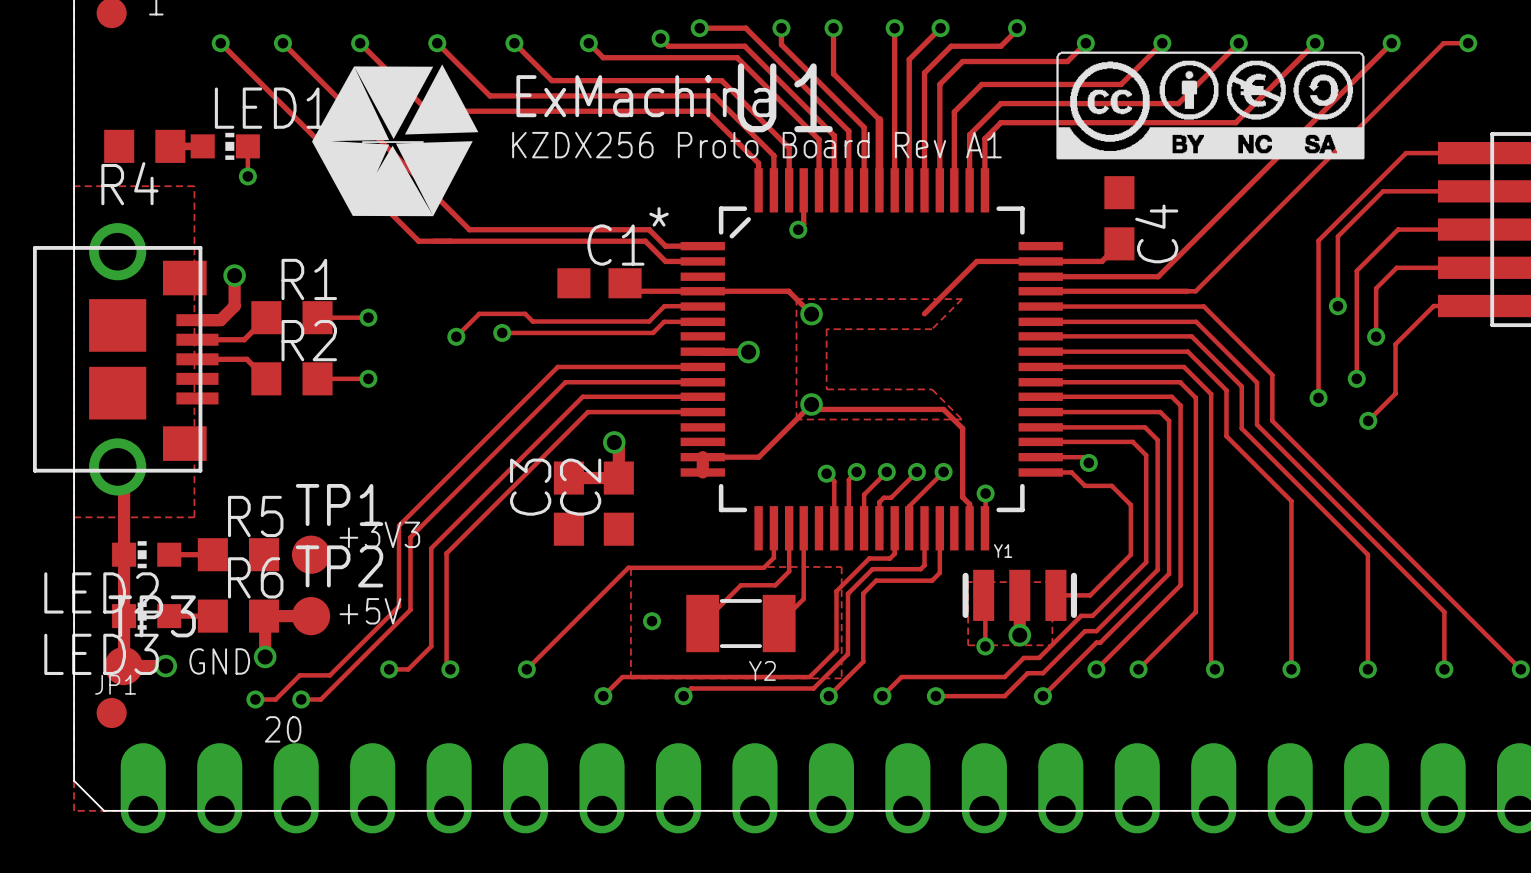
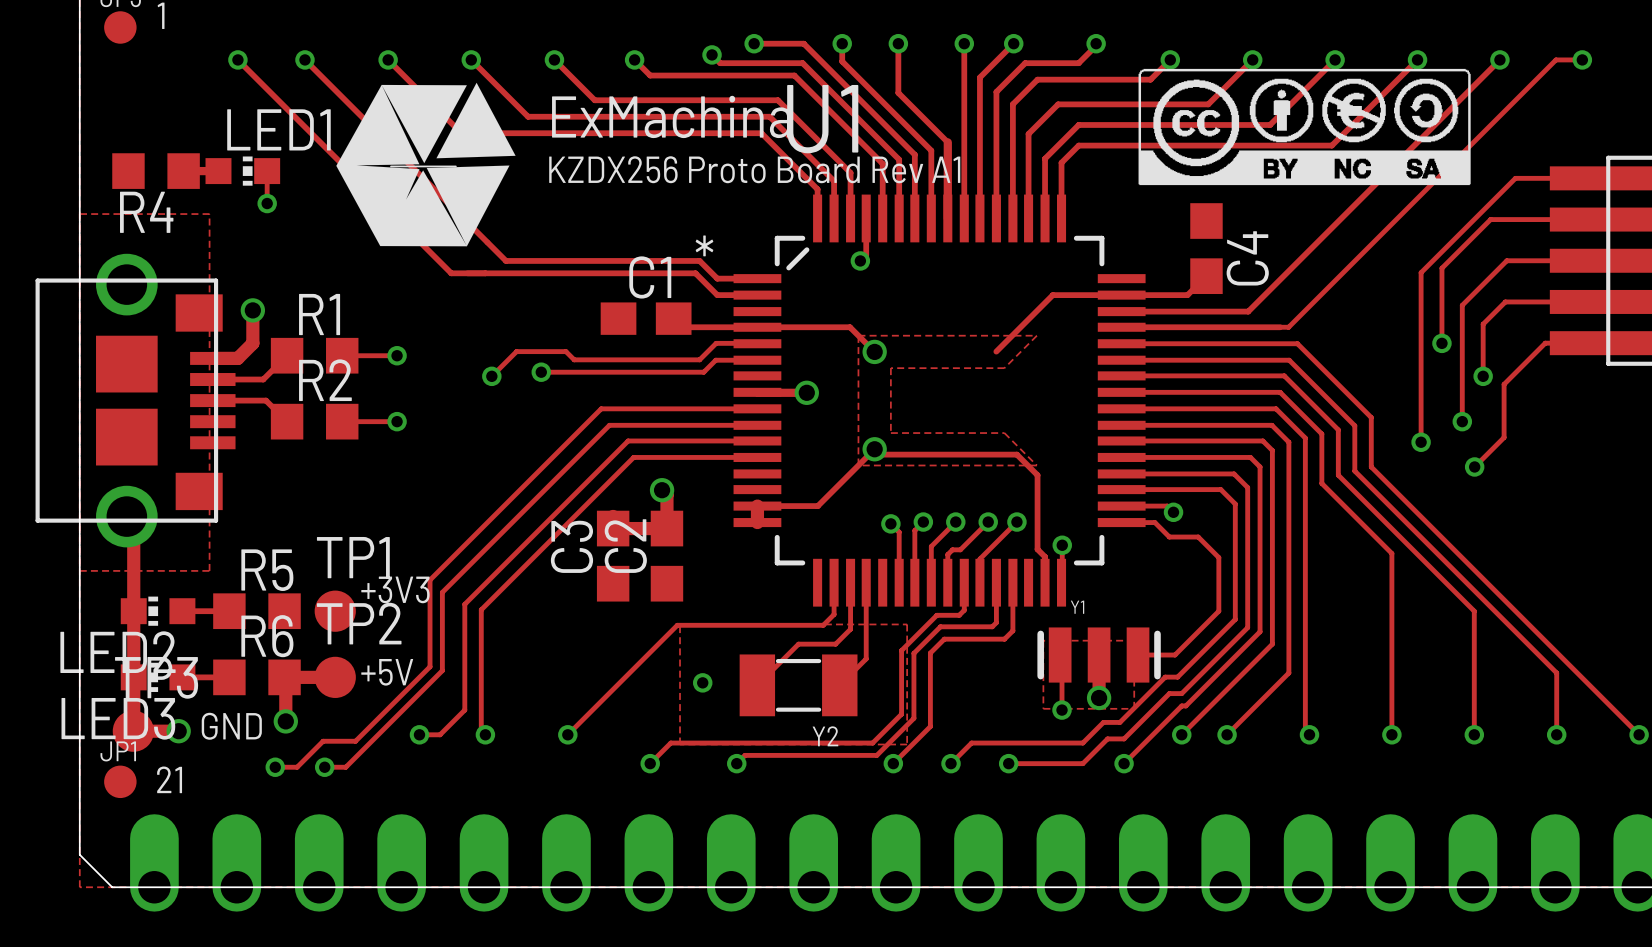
text: none -> 21 (169, 779)
text: 20 (283, 729) -> none

